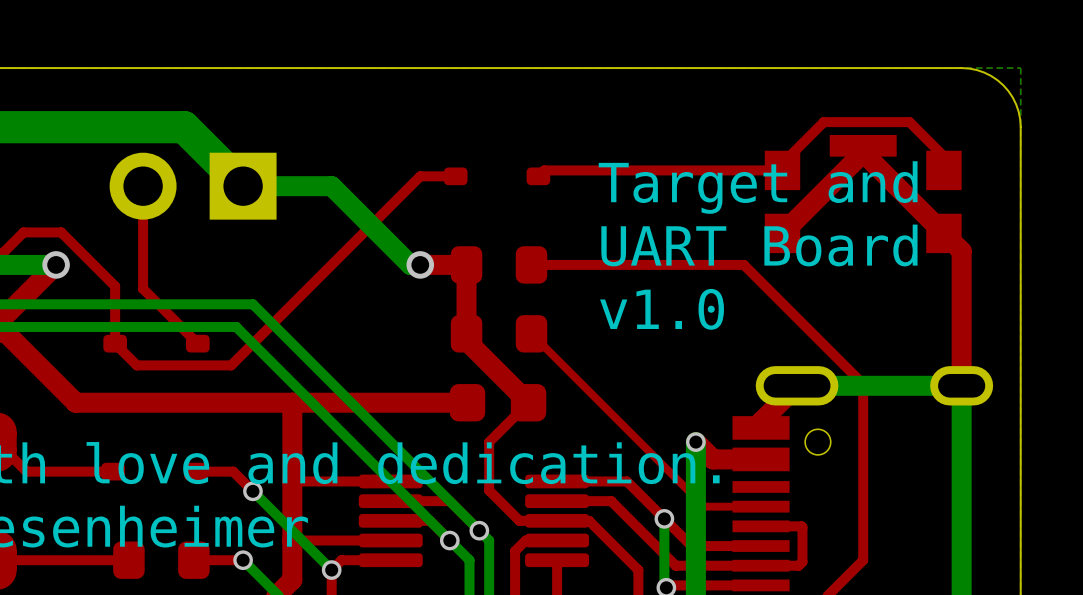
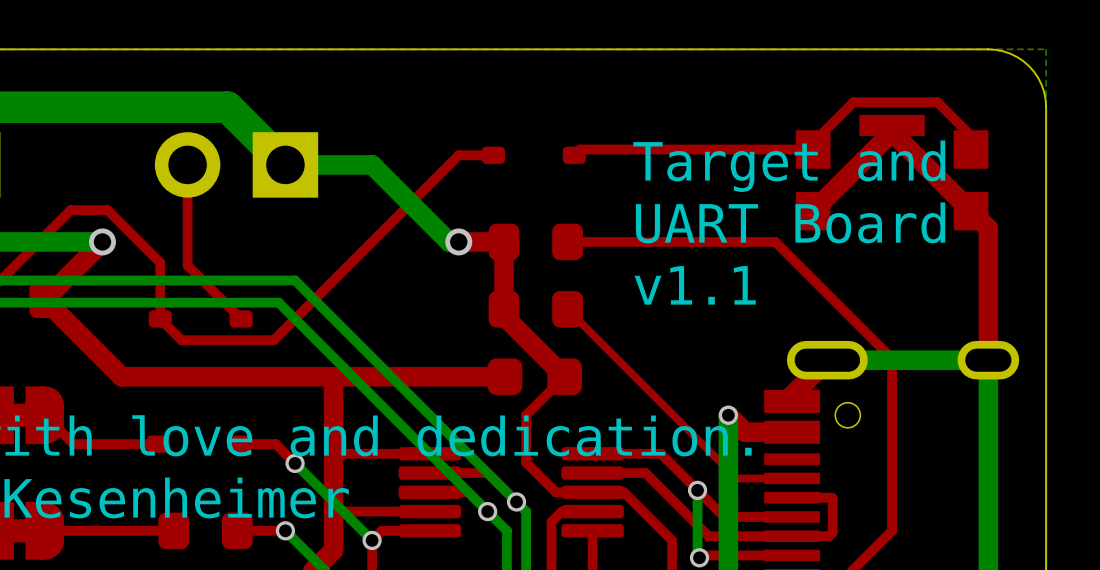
text: v1.0 (662, 309) -> v1.1 (695, 285)

